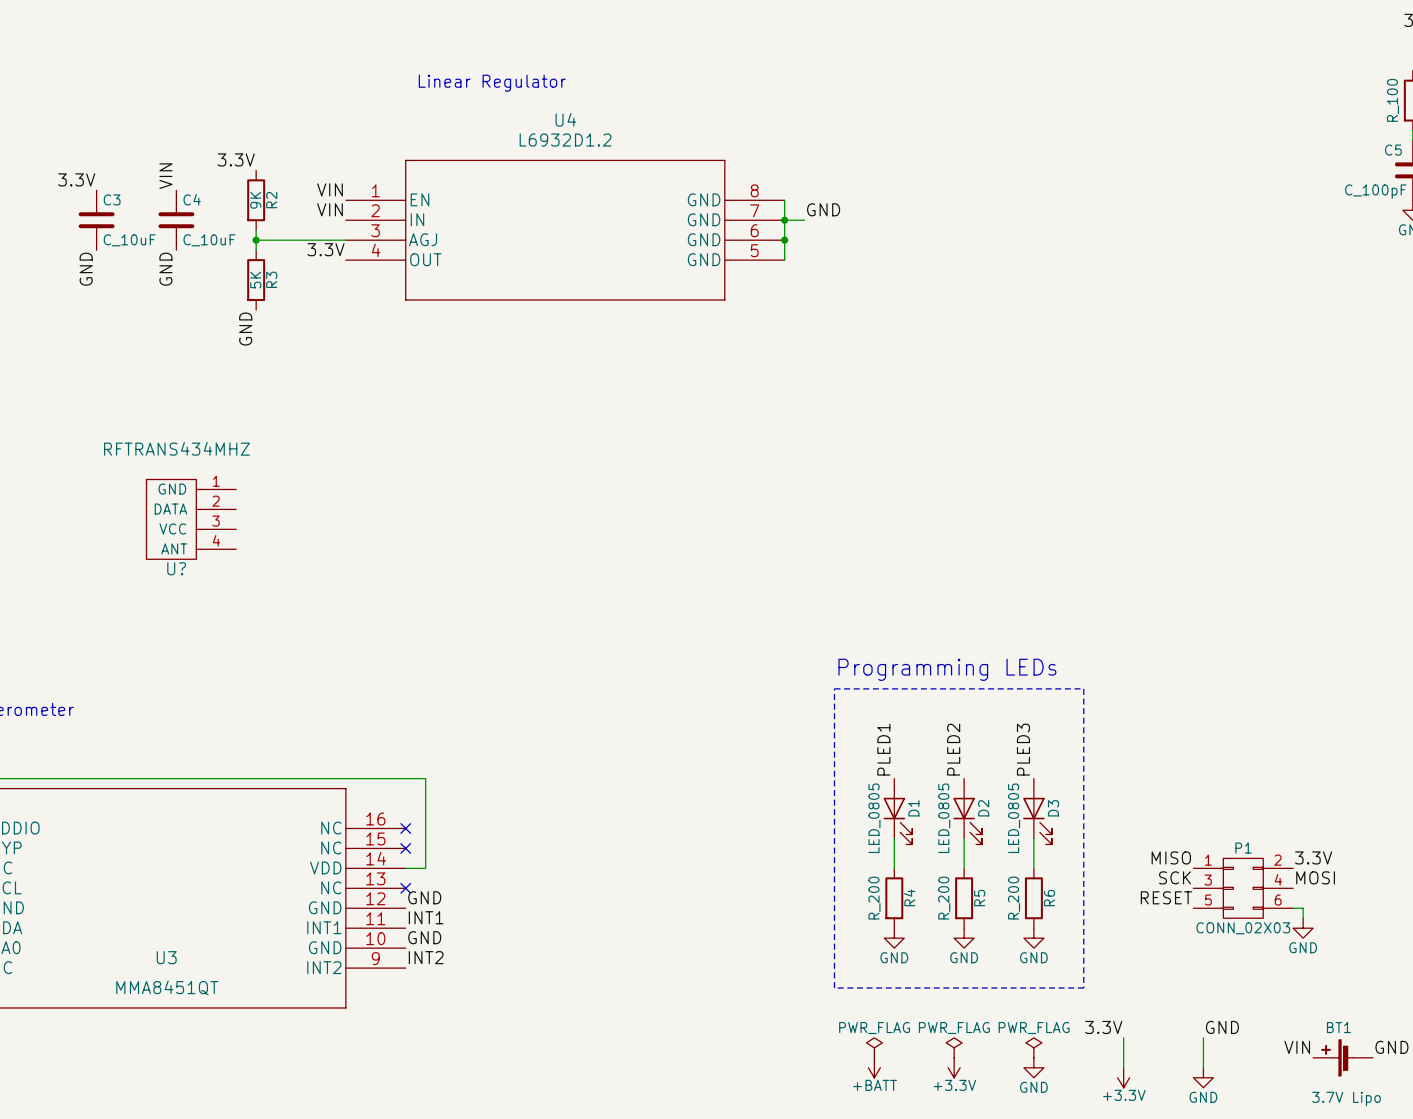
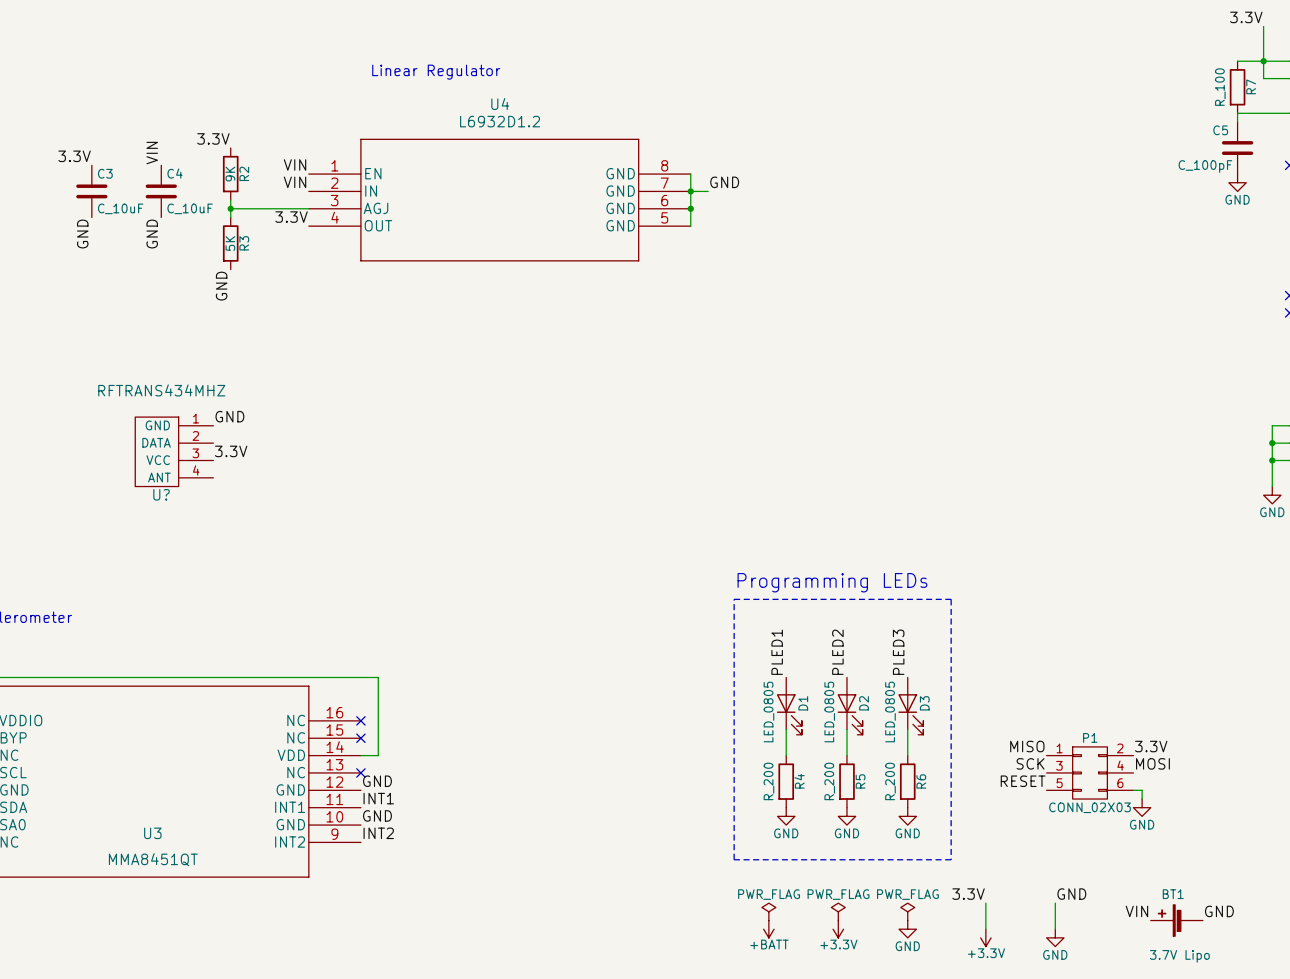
label: none -> GND (229, 416)
label: none -> 3.3V (231, 451)

